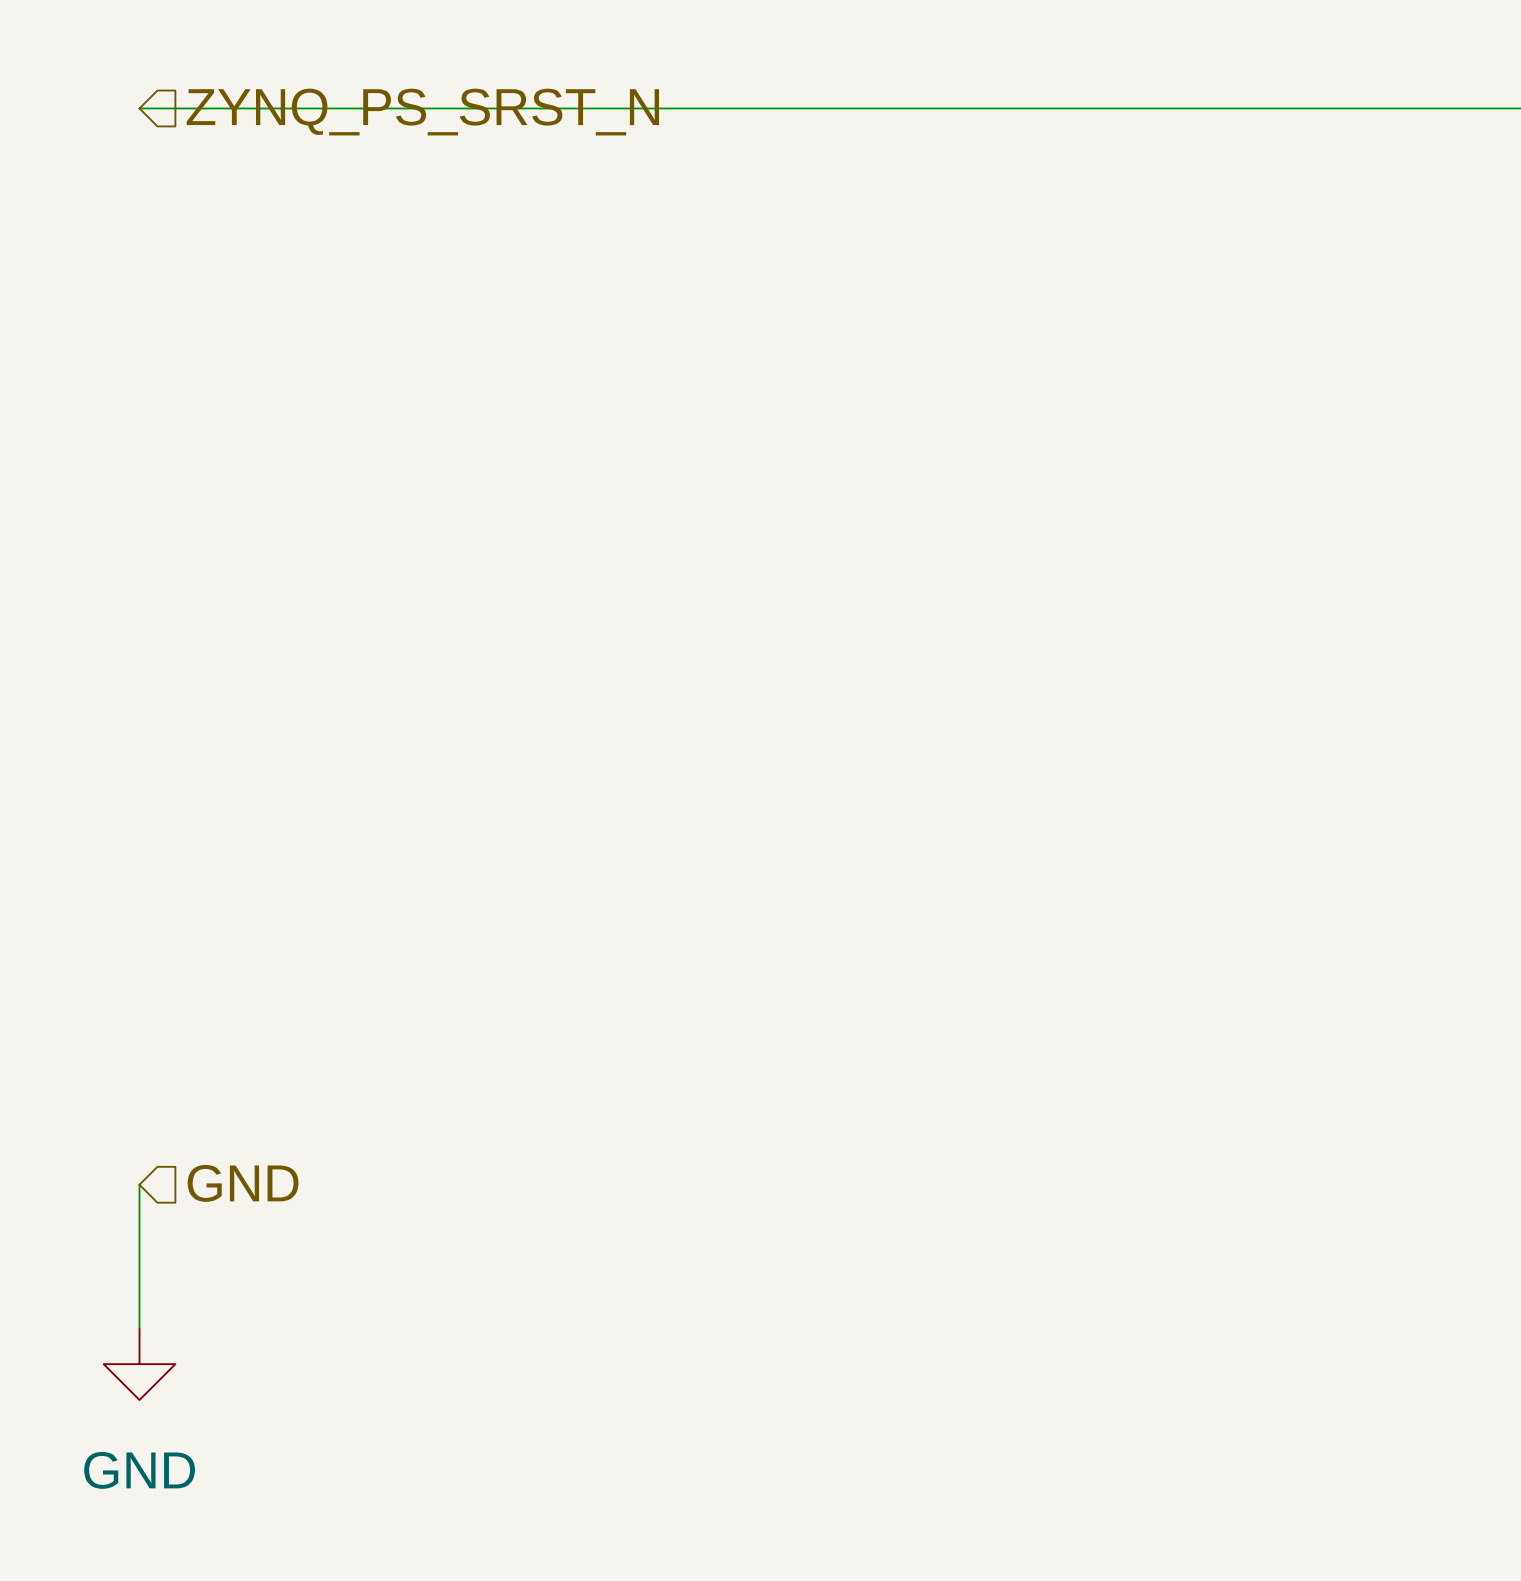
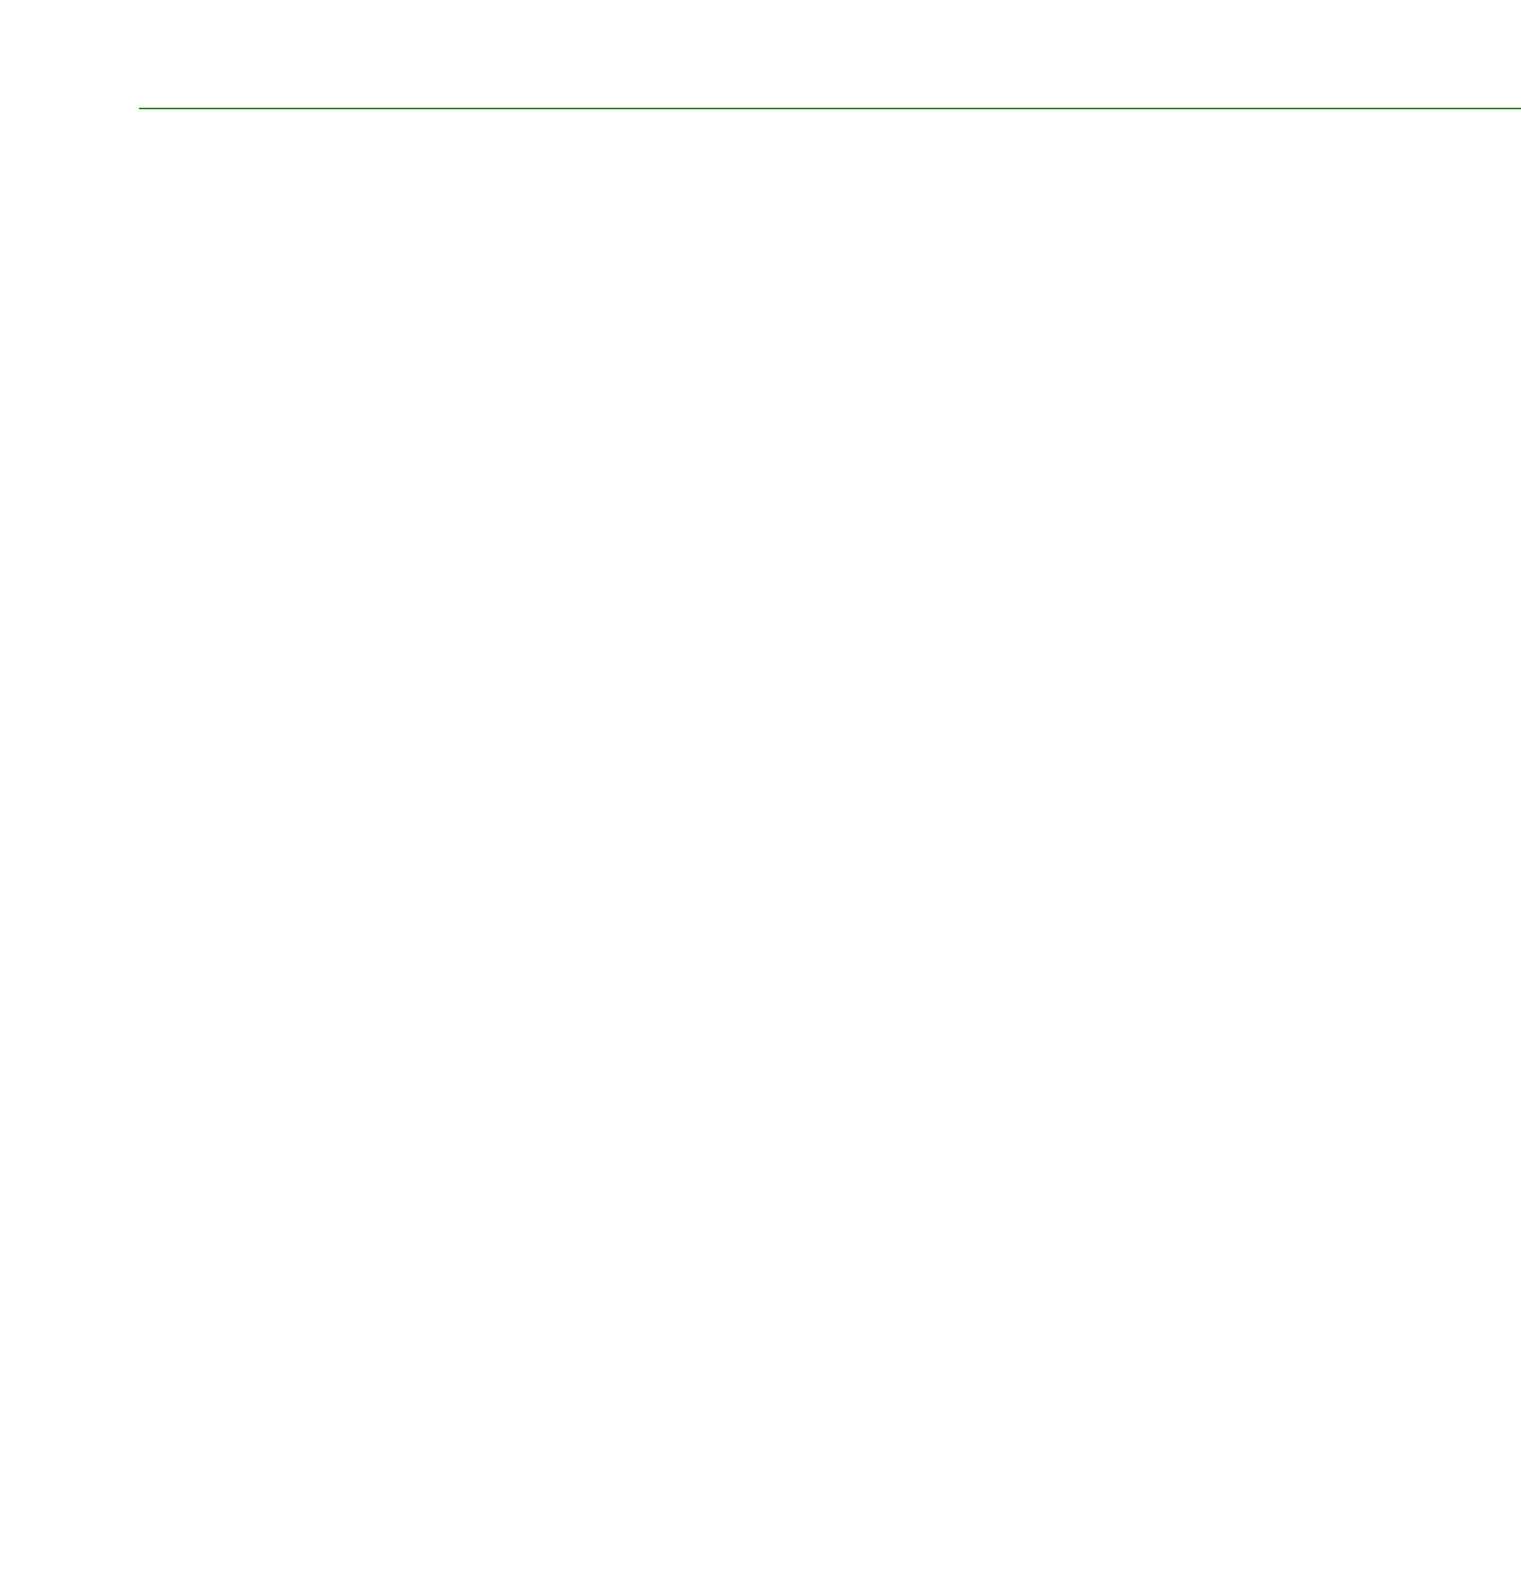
hierarchical label: ZYNQ_PS_SRST_N (422, 112) -> none
hierarchical label: GND (243, 1183) -> none
wire: (139, 1184) (139, 1328) -> none
power symbol: GND (139, 1364) -> none

